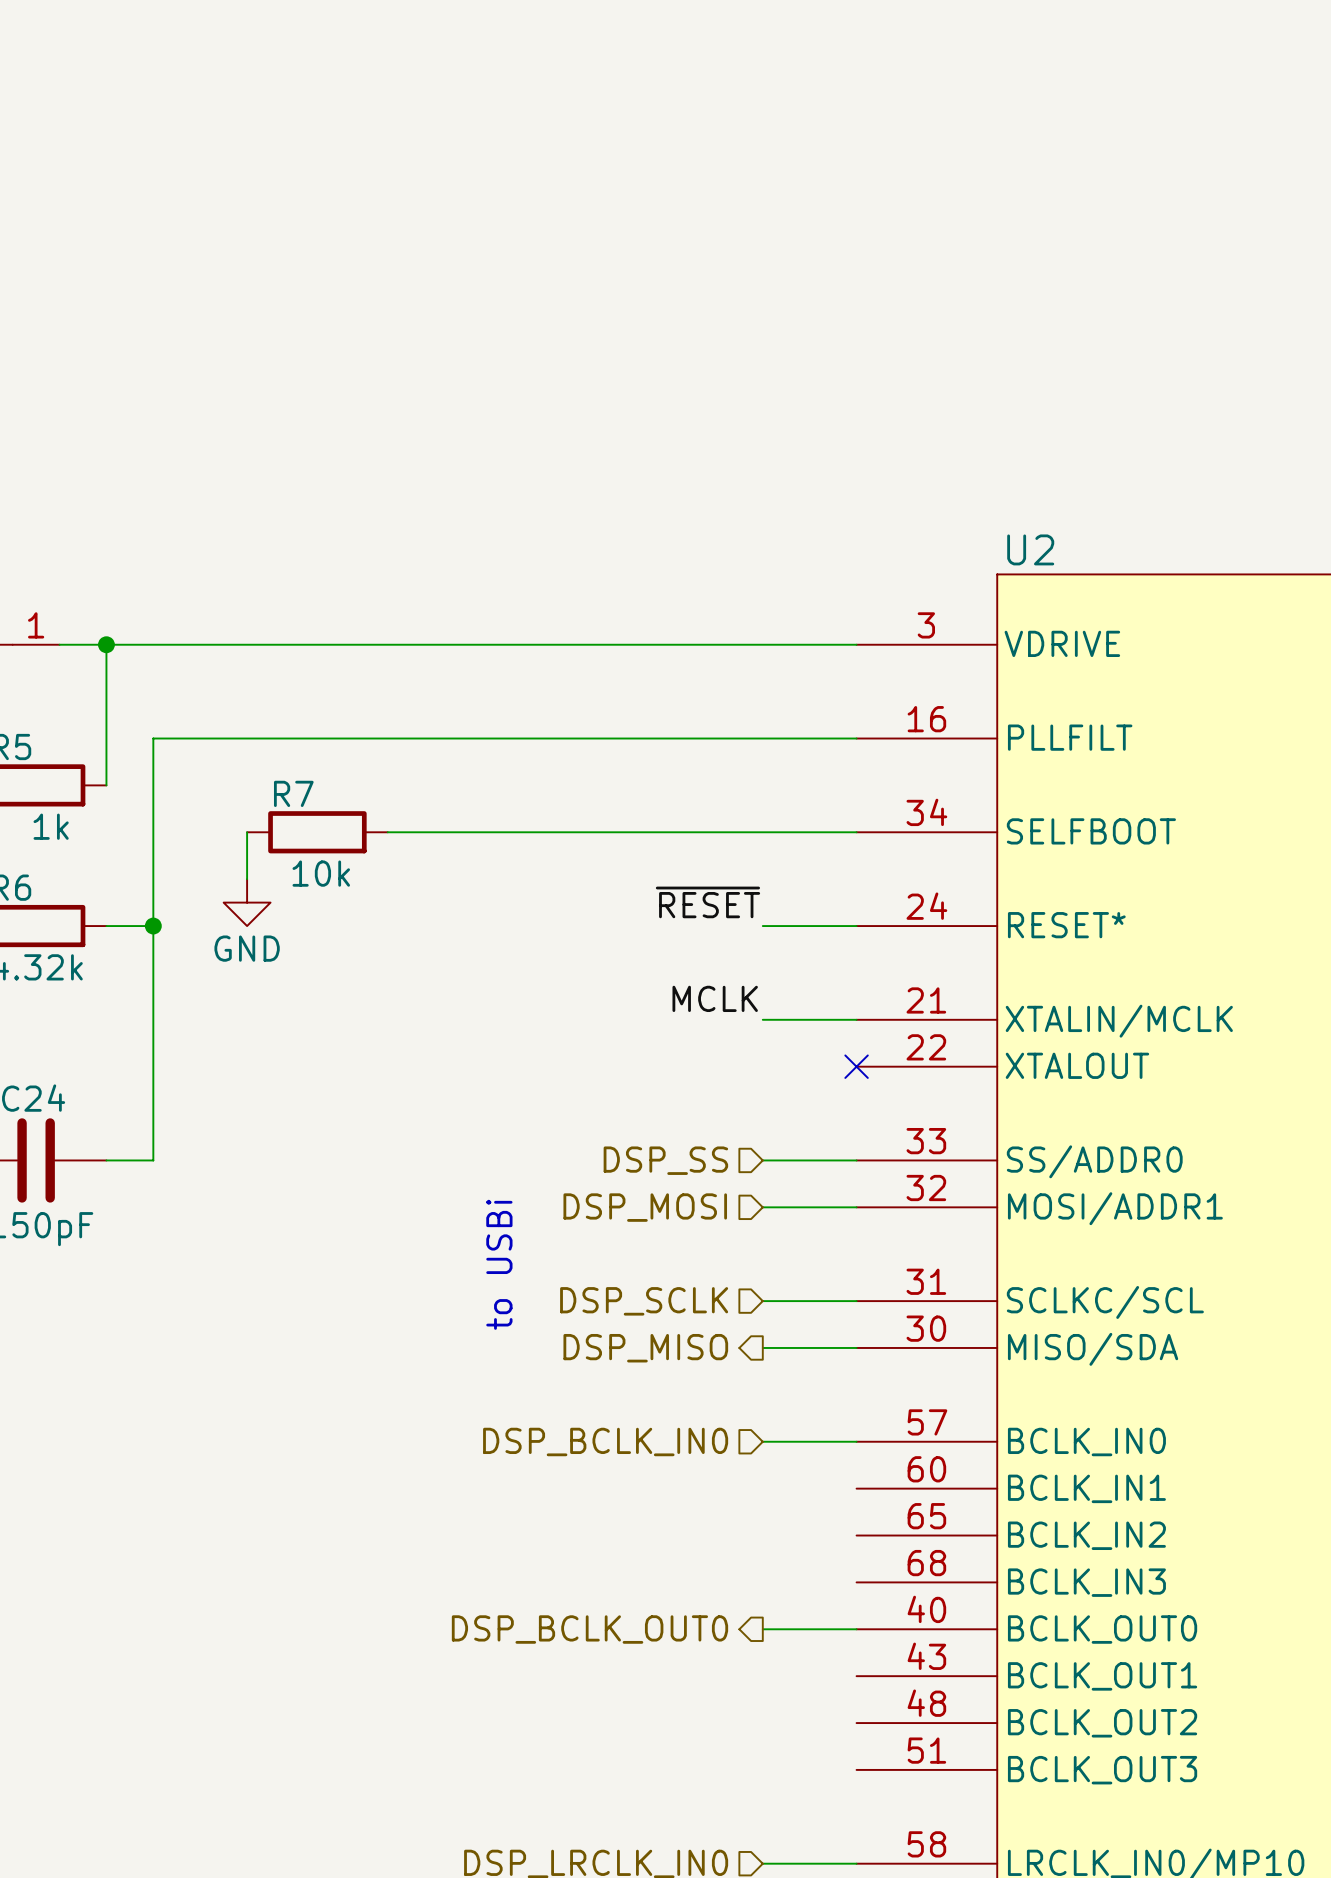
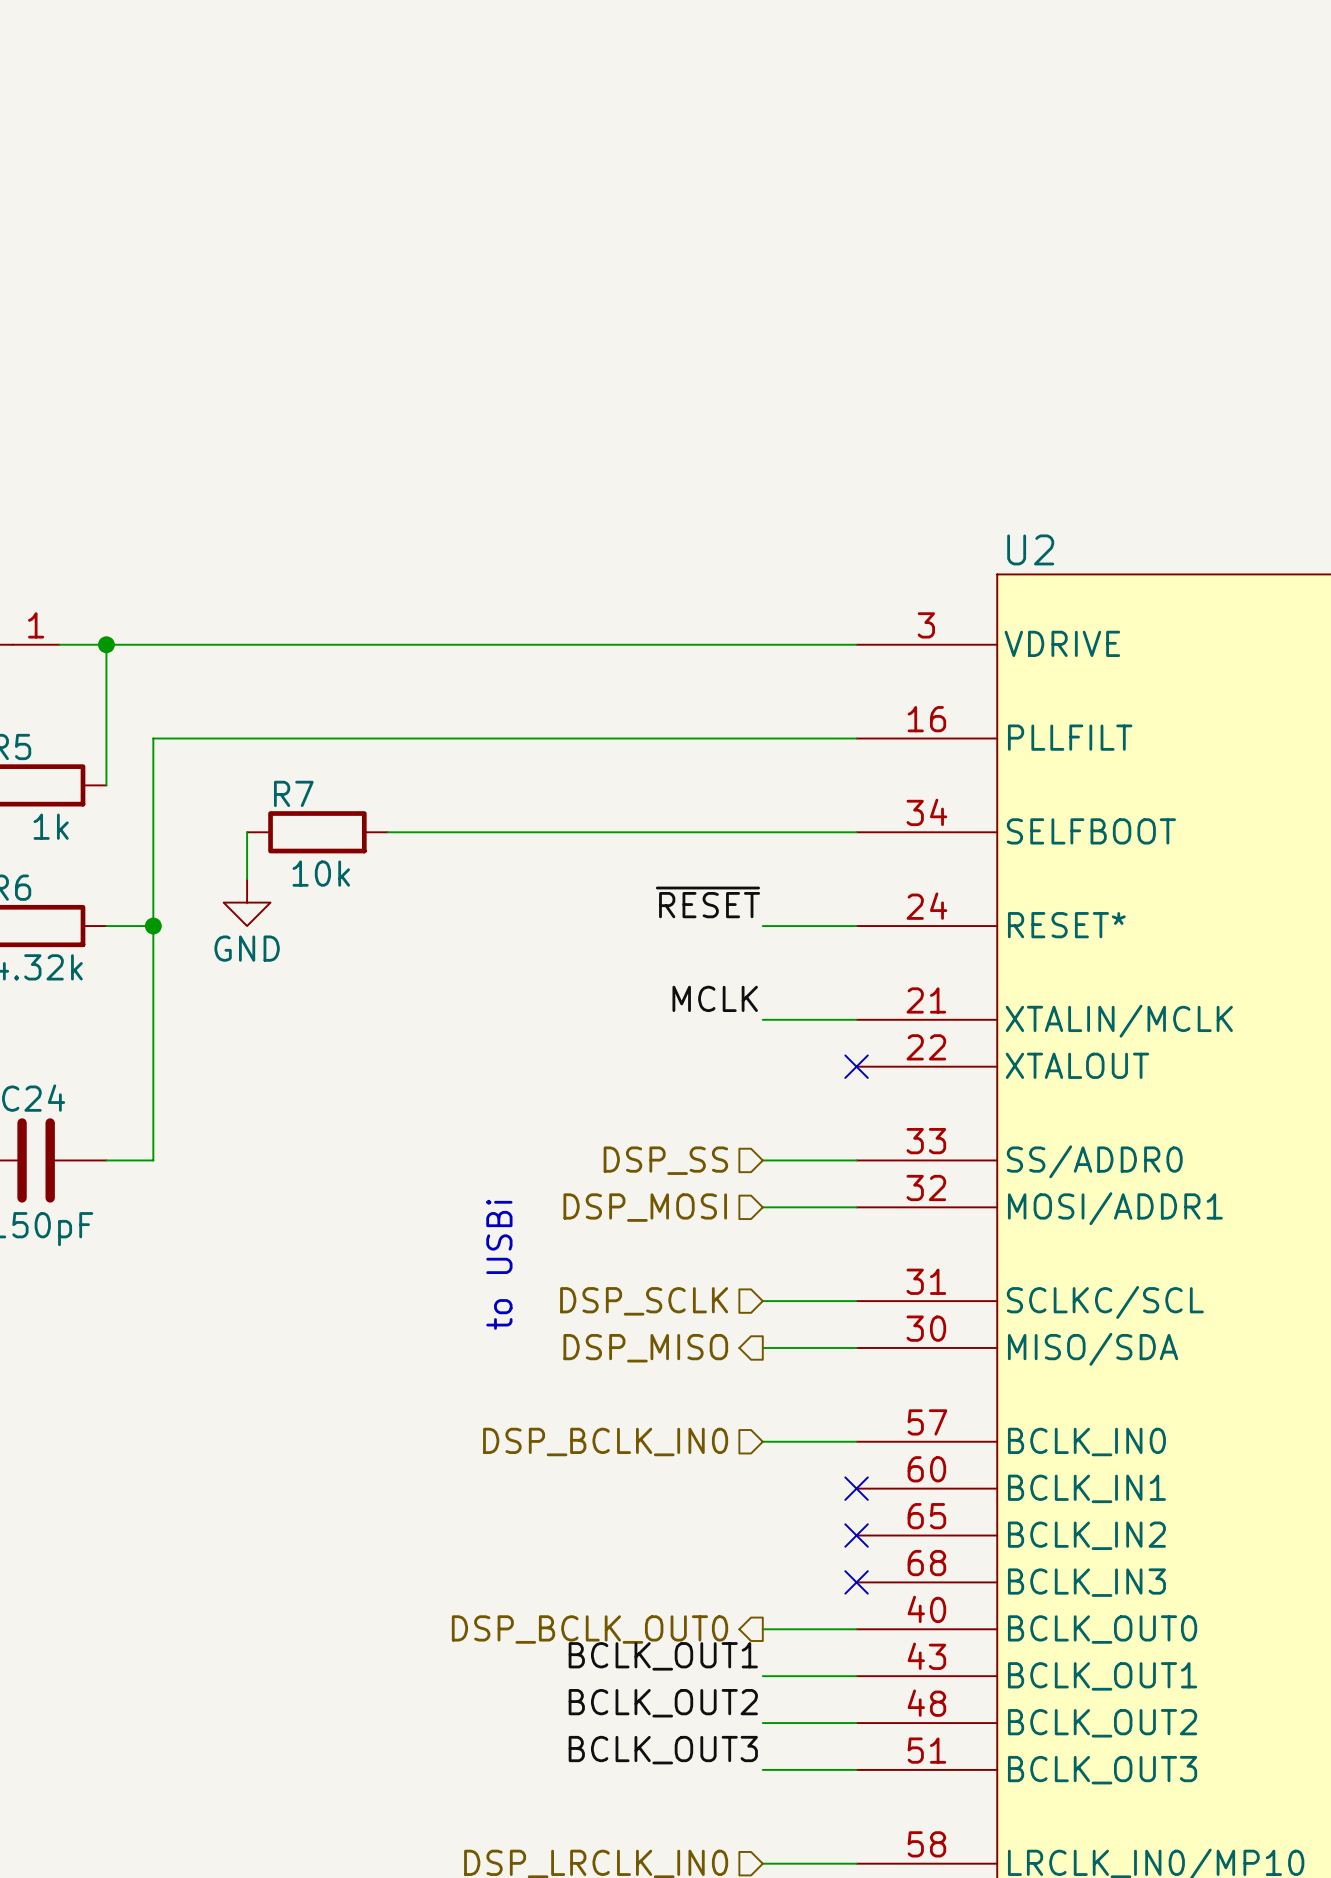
no-connect mark: none -> (856, 1488)
no-connect mark: none -> (856, 1535)
no-connect mark: none -> (856, 1582)
label: none -> BCLK_OUT1 (663, 1656)
wire: none -> (762, 1676) (856, 1676)
label: none -> BCLK_OUT2 (663, 1703)
wire: none -> (762, 1723) (856, 1723)
label: none -> BCLK_OUT3 (663, 1750)
wire: none -> (762, 1769) (856, 1769)

